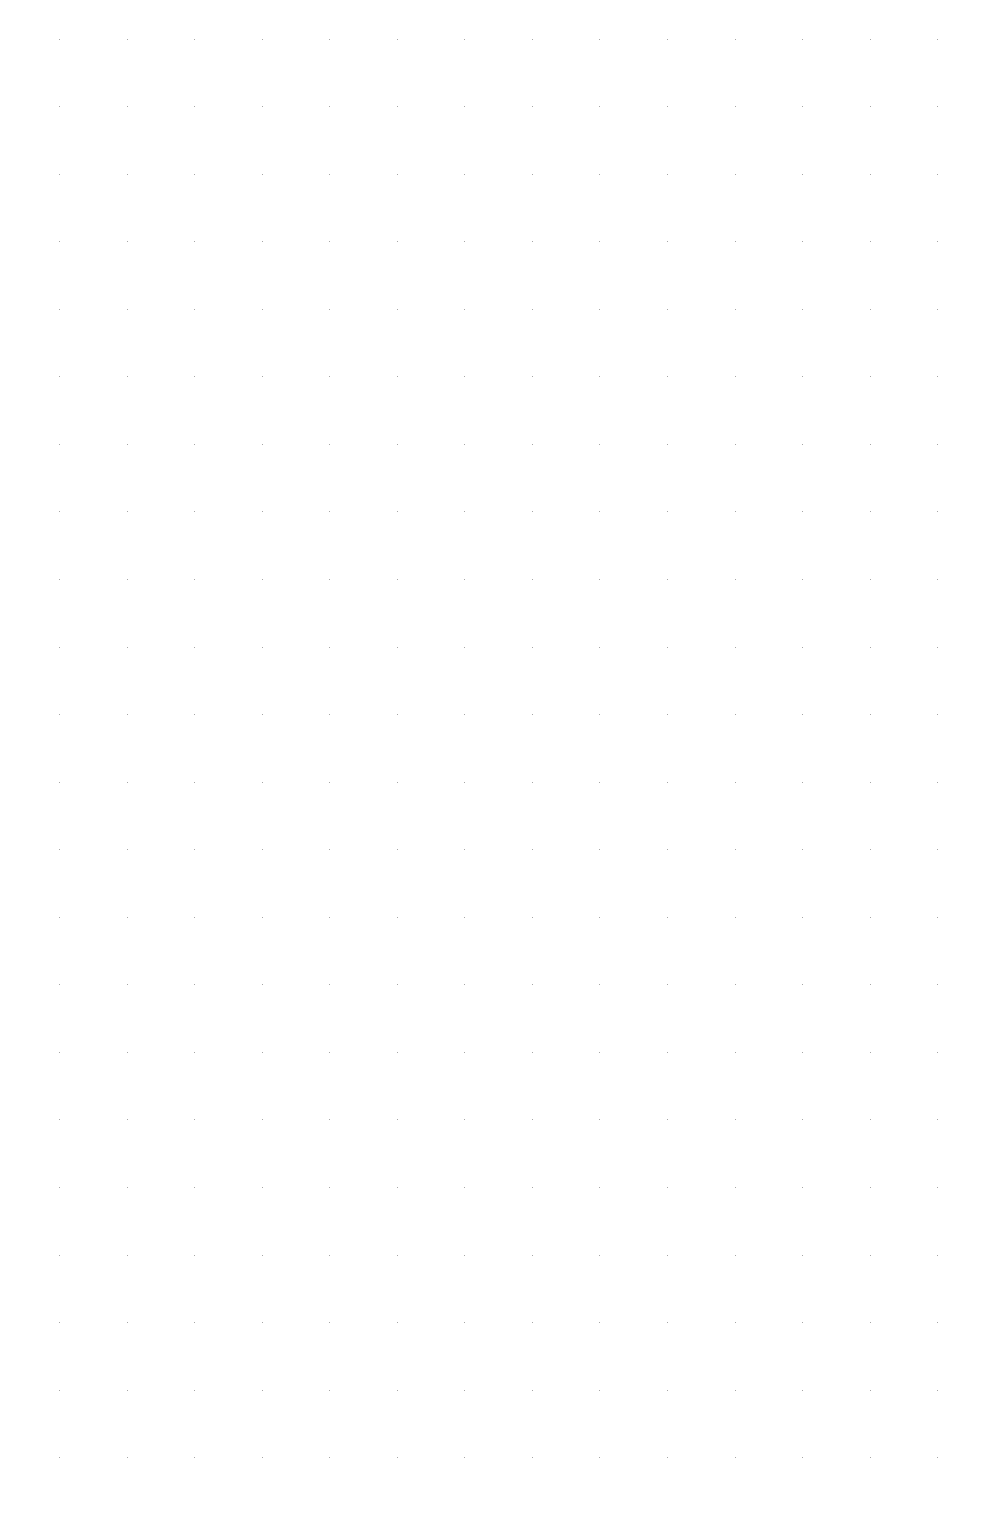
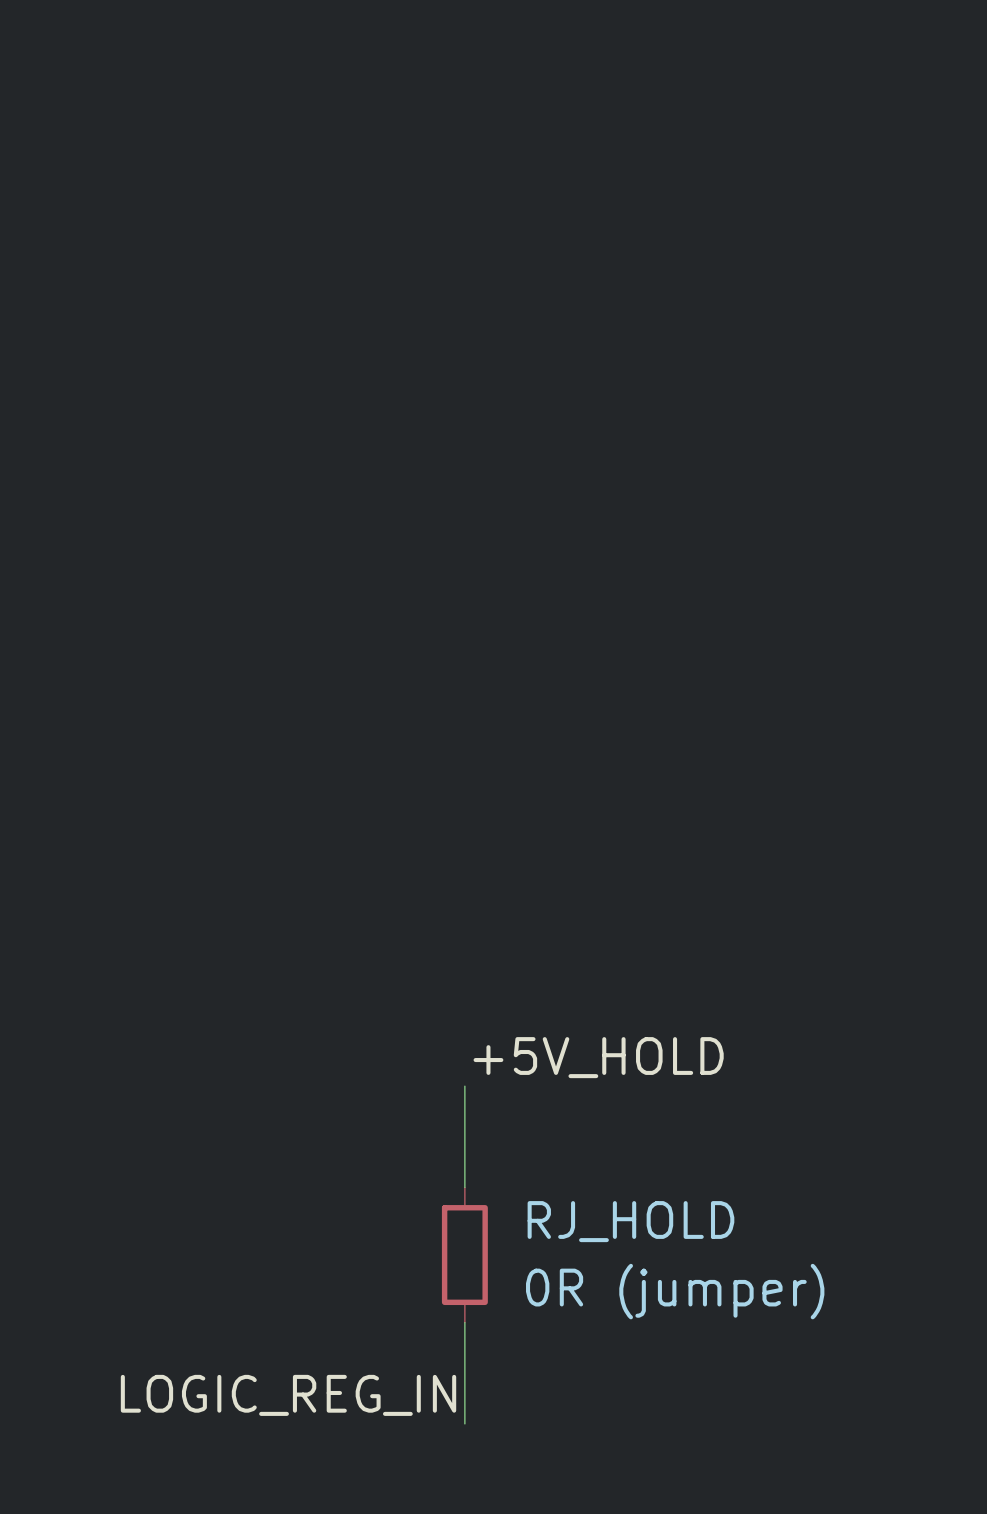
label: none -> +5V_HOLD (598, 1057)
wire: none -> (464, 1086) (464, 1187)
RJ_HOLD: none -> 0R (jumper) (464, 1255)
wire: none -> (464, 1322) (464, 1423)
label: none -> LOGIC_REG_IN (288, 1395)

